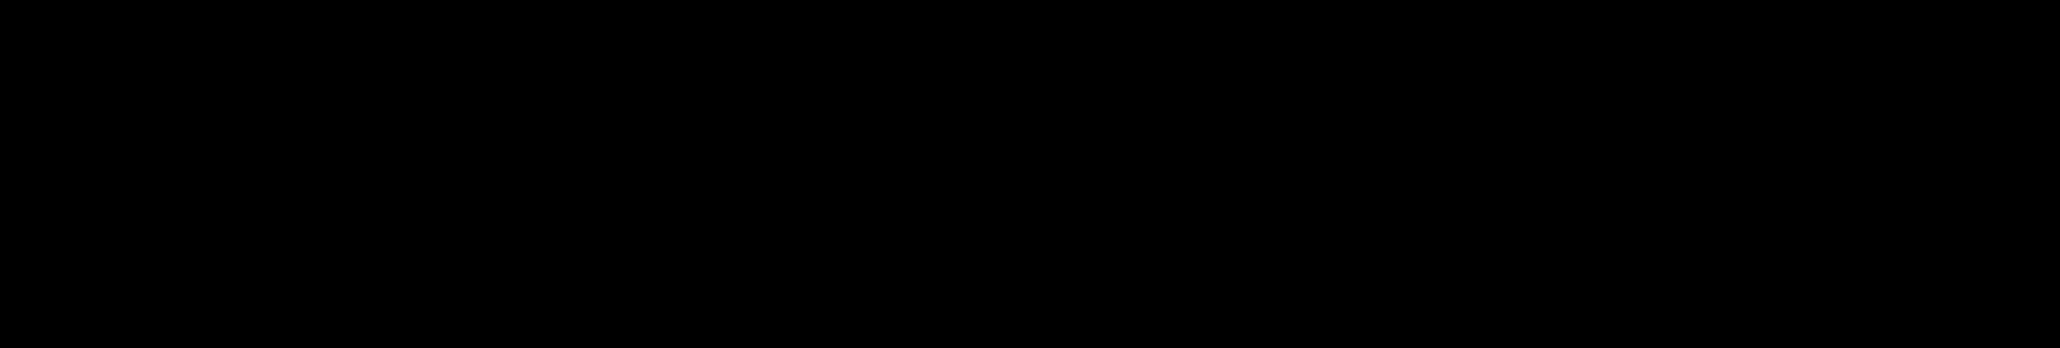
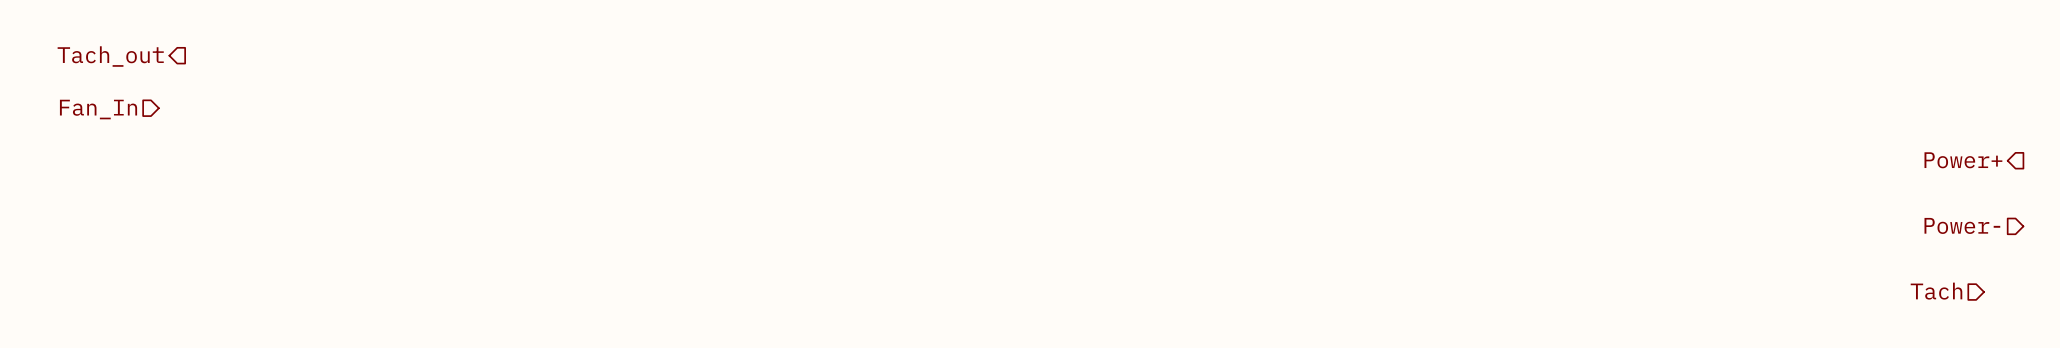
hierarchical label: none -> Tach_out (110, 56)
hierarchical label: none -> Fan_In (98, 109)
hierarchical label: none -> Power+ (1963, 160)
hierarchical label: none -> Power- (1962, 225)
hierarchical label: none -> Tach (1936, 291)

